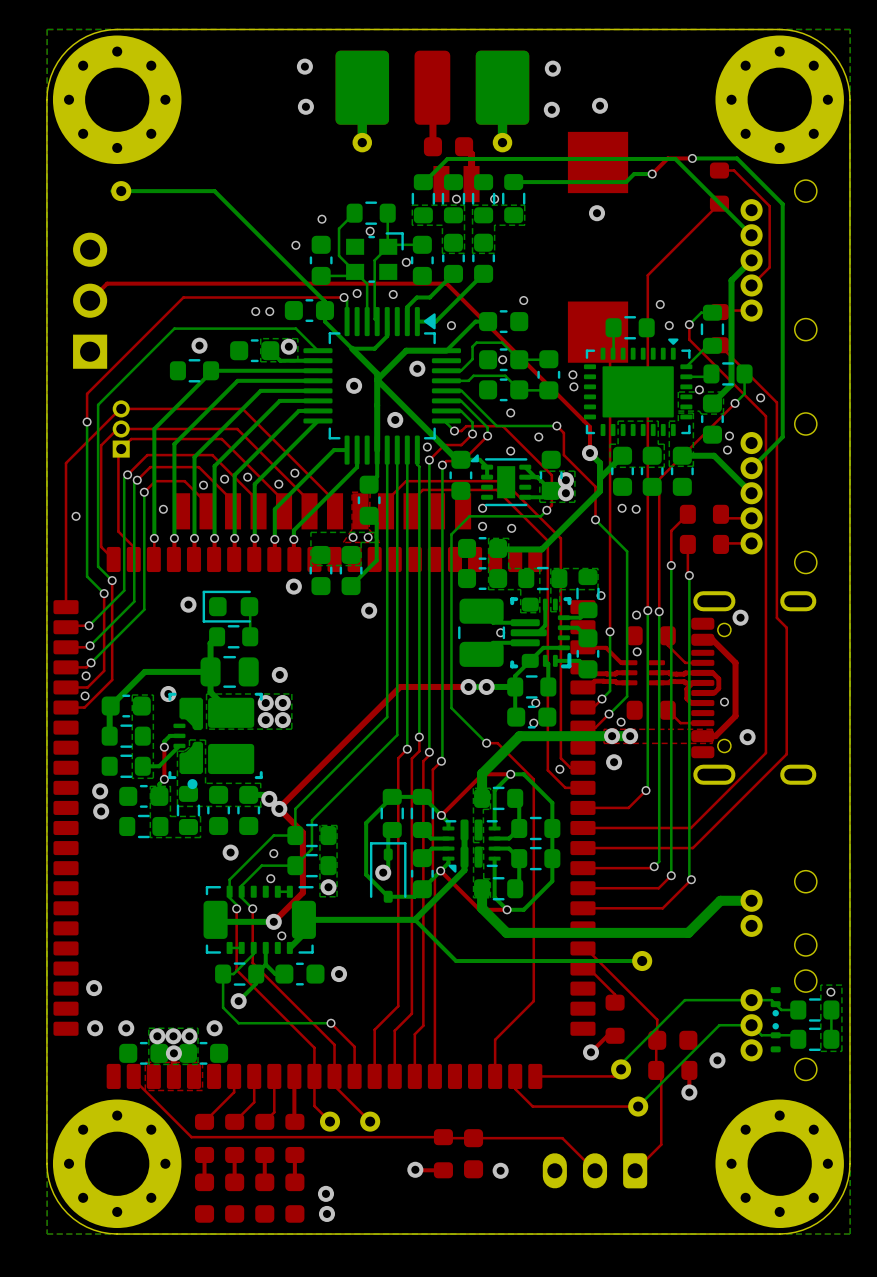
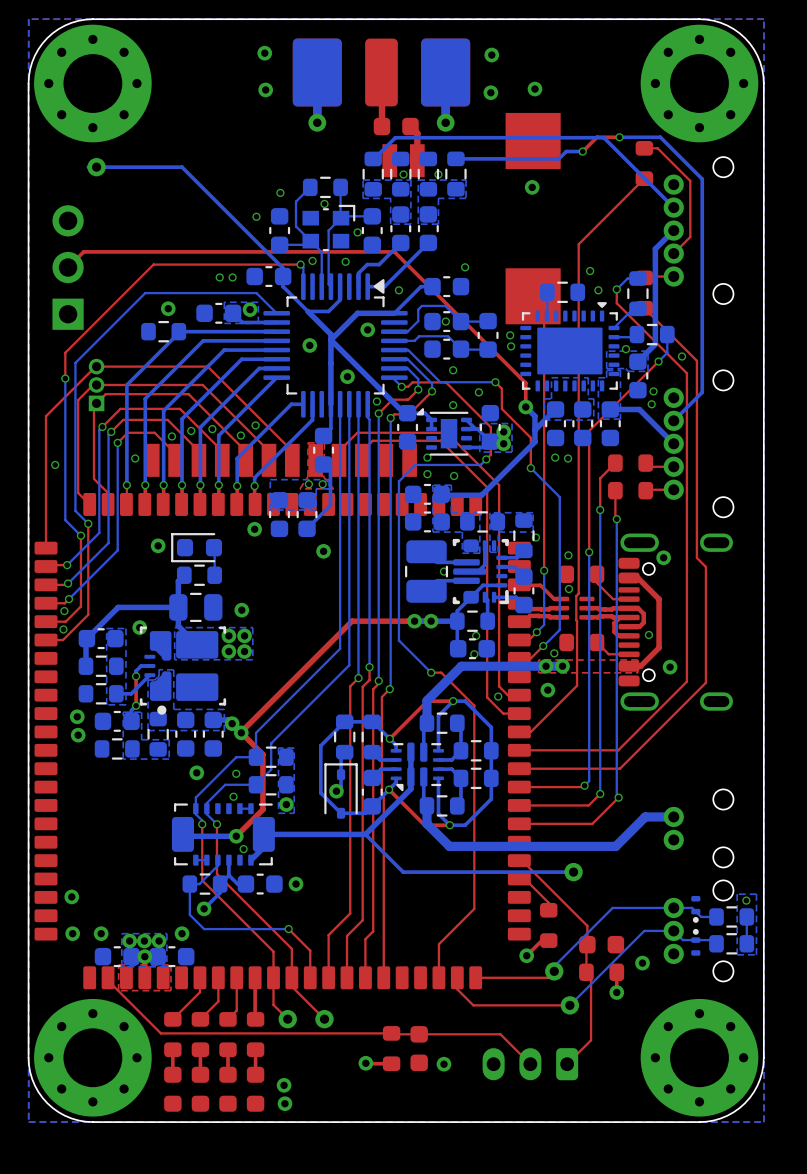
bottom track: (647, 610) (647, 788) (645, 790) -> none
via: (647, 610) -> none
bottom zone outline: (490, 788) (490, 809) (483, 809) (483, 842) (473, 842) (473, 788) (490, 788) -> none
top track: (645, 790) (628, 807) (595, 807) -> (578, 552) (578, 593) (576, 596) (577, 685) (530, 731)
via: (645, 790) -> none
bottom track: none -> (423, 726) (423, 752)
bottom zone outline: (483, 847) (473, 847) (473, 897) (490, 897) (490, 878) (483, 878) (483, 847) -> none
bottom track: none -> (423, 776) (423, 802)

